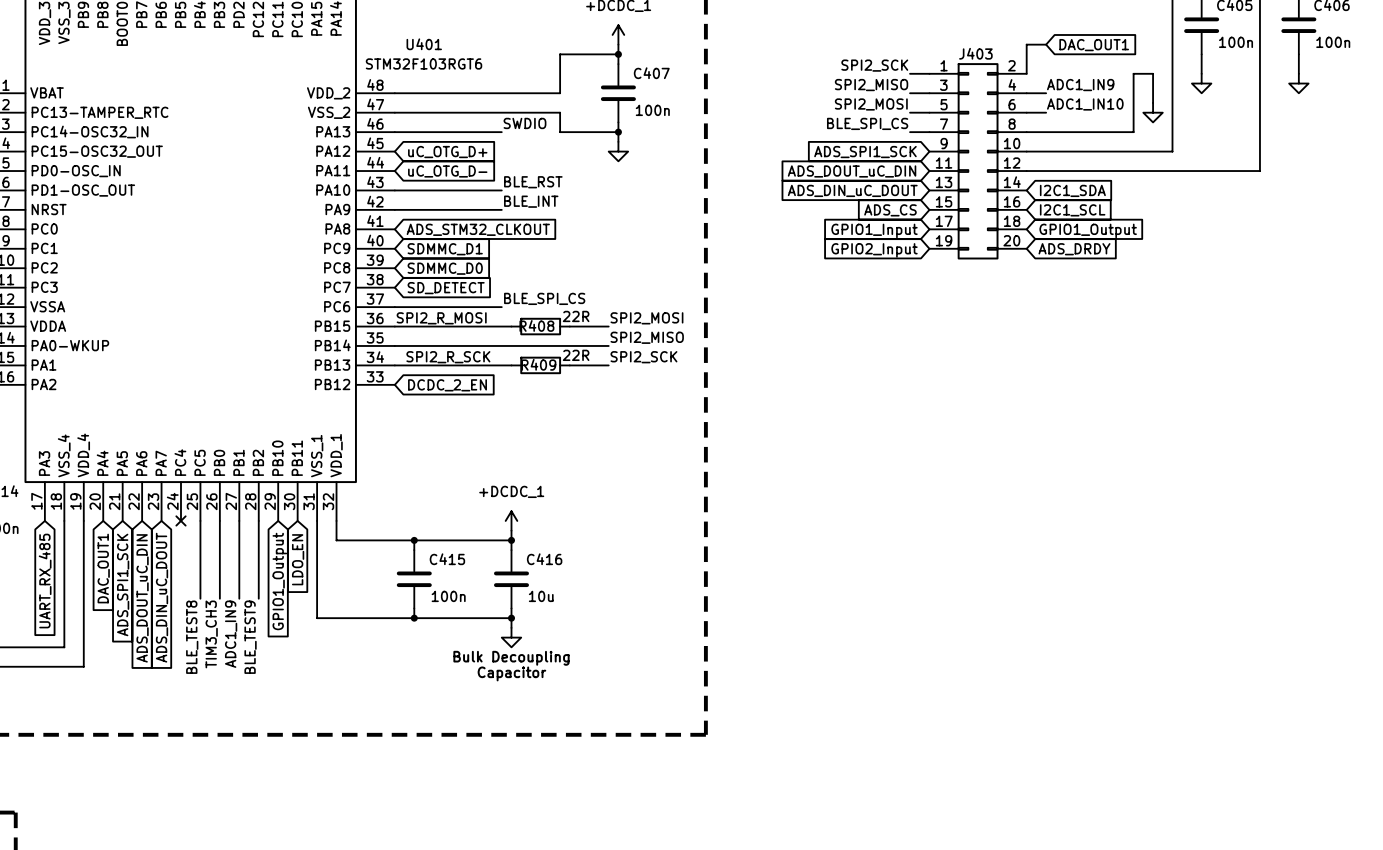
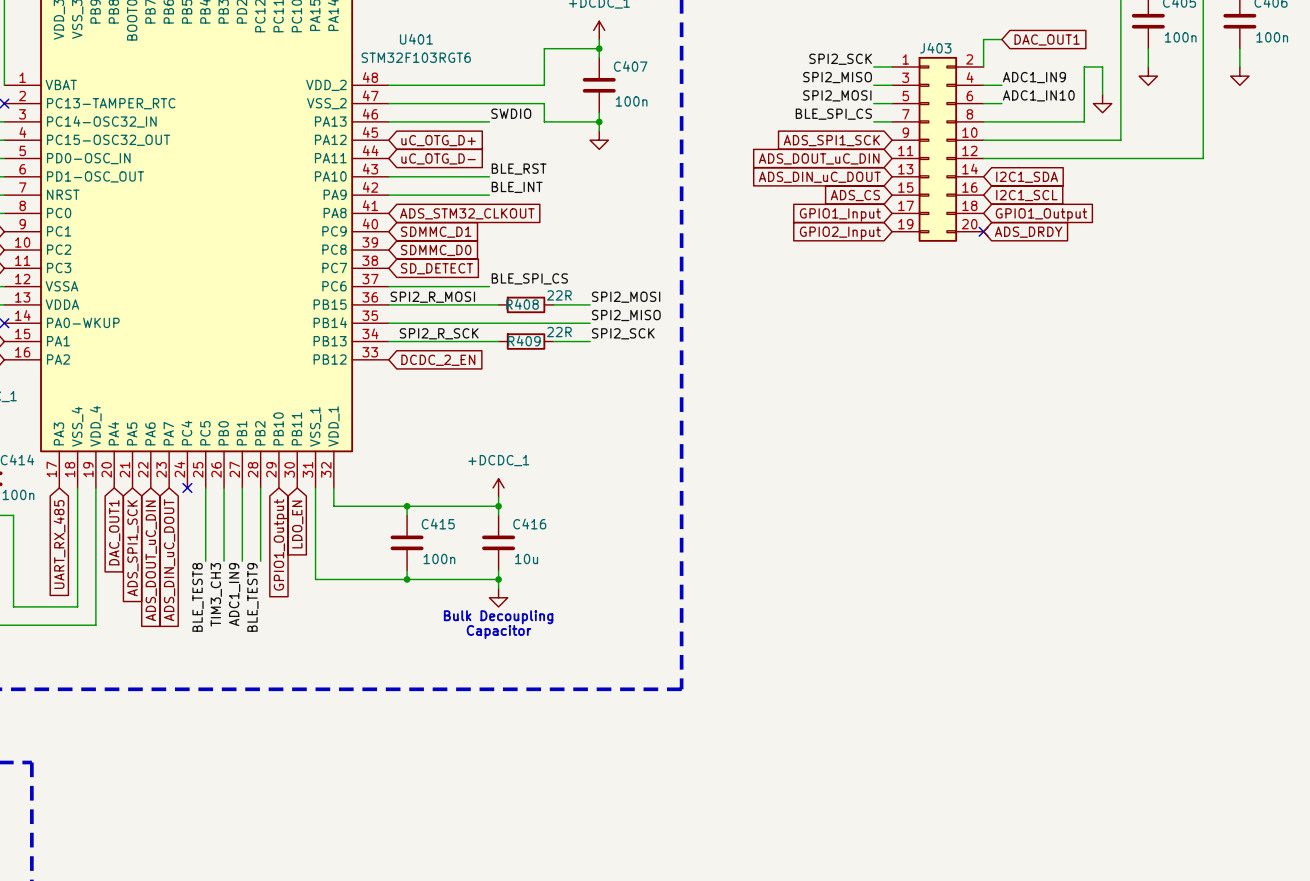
no-connect mark: none -> (983, 231)

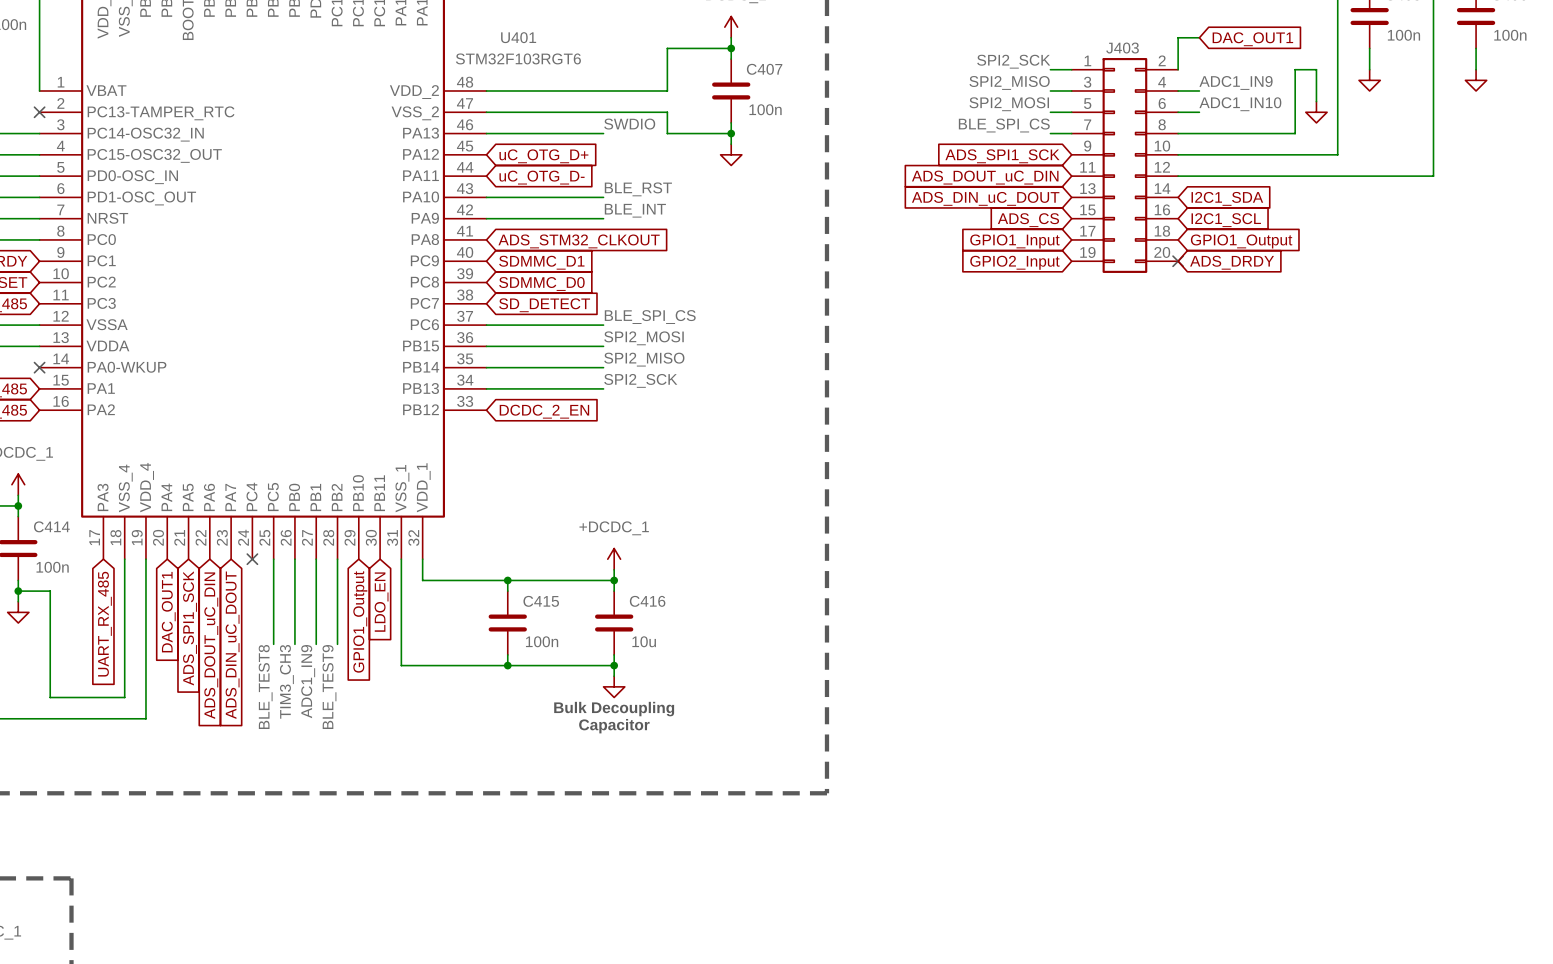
label: SPI2_R_MOSI (432, 297) -> none
label position: SPI2_MOSI (626, 297) -> SPI2_MOSI (644, 338)
wire: (489, 304) (498, 304) -> none
R408: 22R (526, 304) -> none
wire: (553, 304) (590, 304) -> none
label position: SPI2_MISO (626, 315) -> SPI2_MISO (644, 359)
wire: (489, 323) (590, 323) -> none
label: SPI2_R_SCK (439, 333) -> none
label position: SPI2_SCK (623, 333) -> SPI2_SCK (640, 380)
wire: (489, 341) (498, 341) -> none
R409: 22R (526, 341) -> none
wire: (553, 341) (590, 341) -> none

